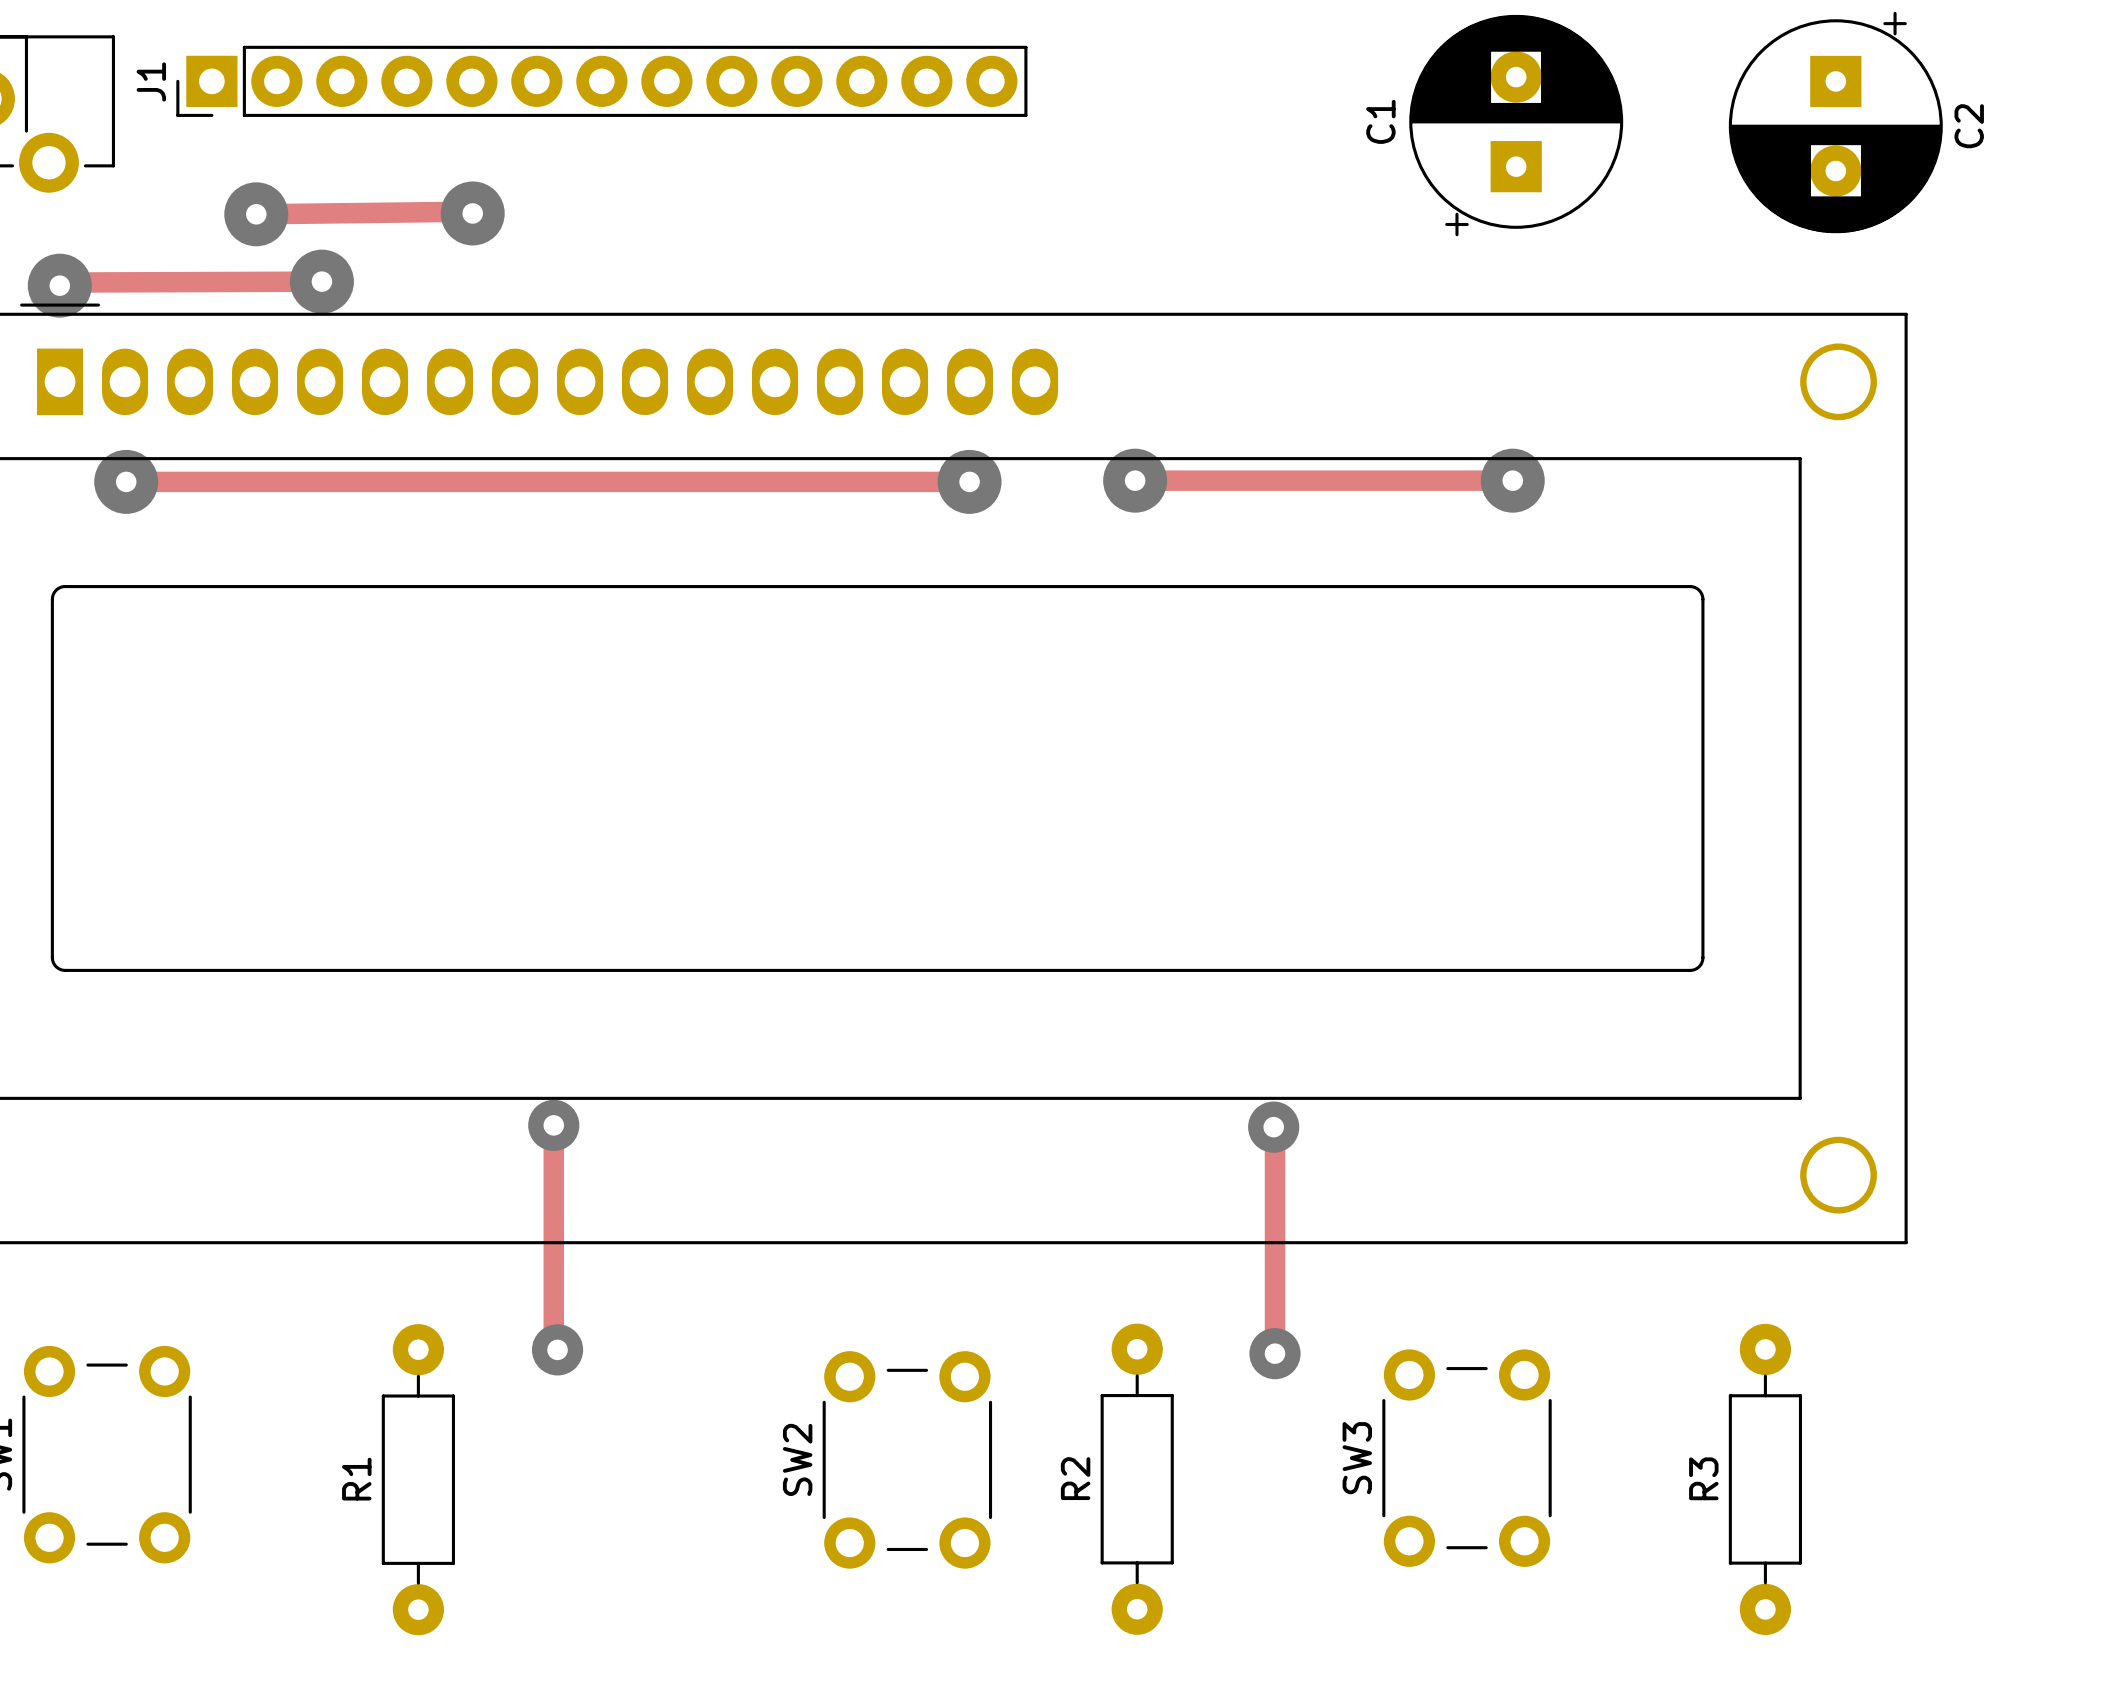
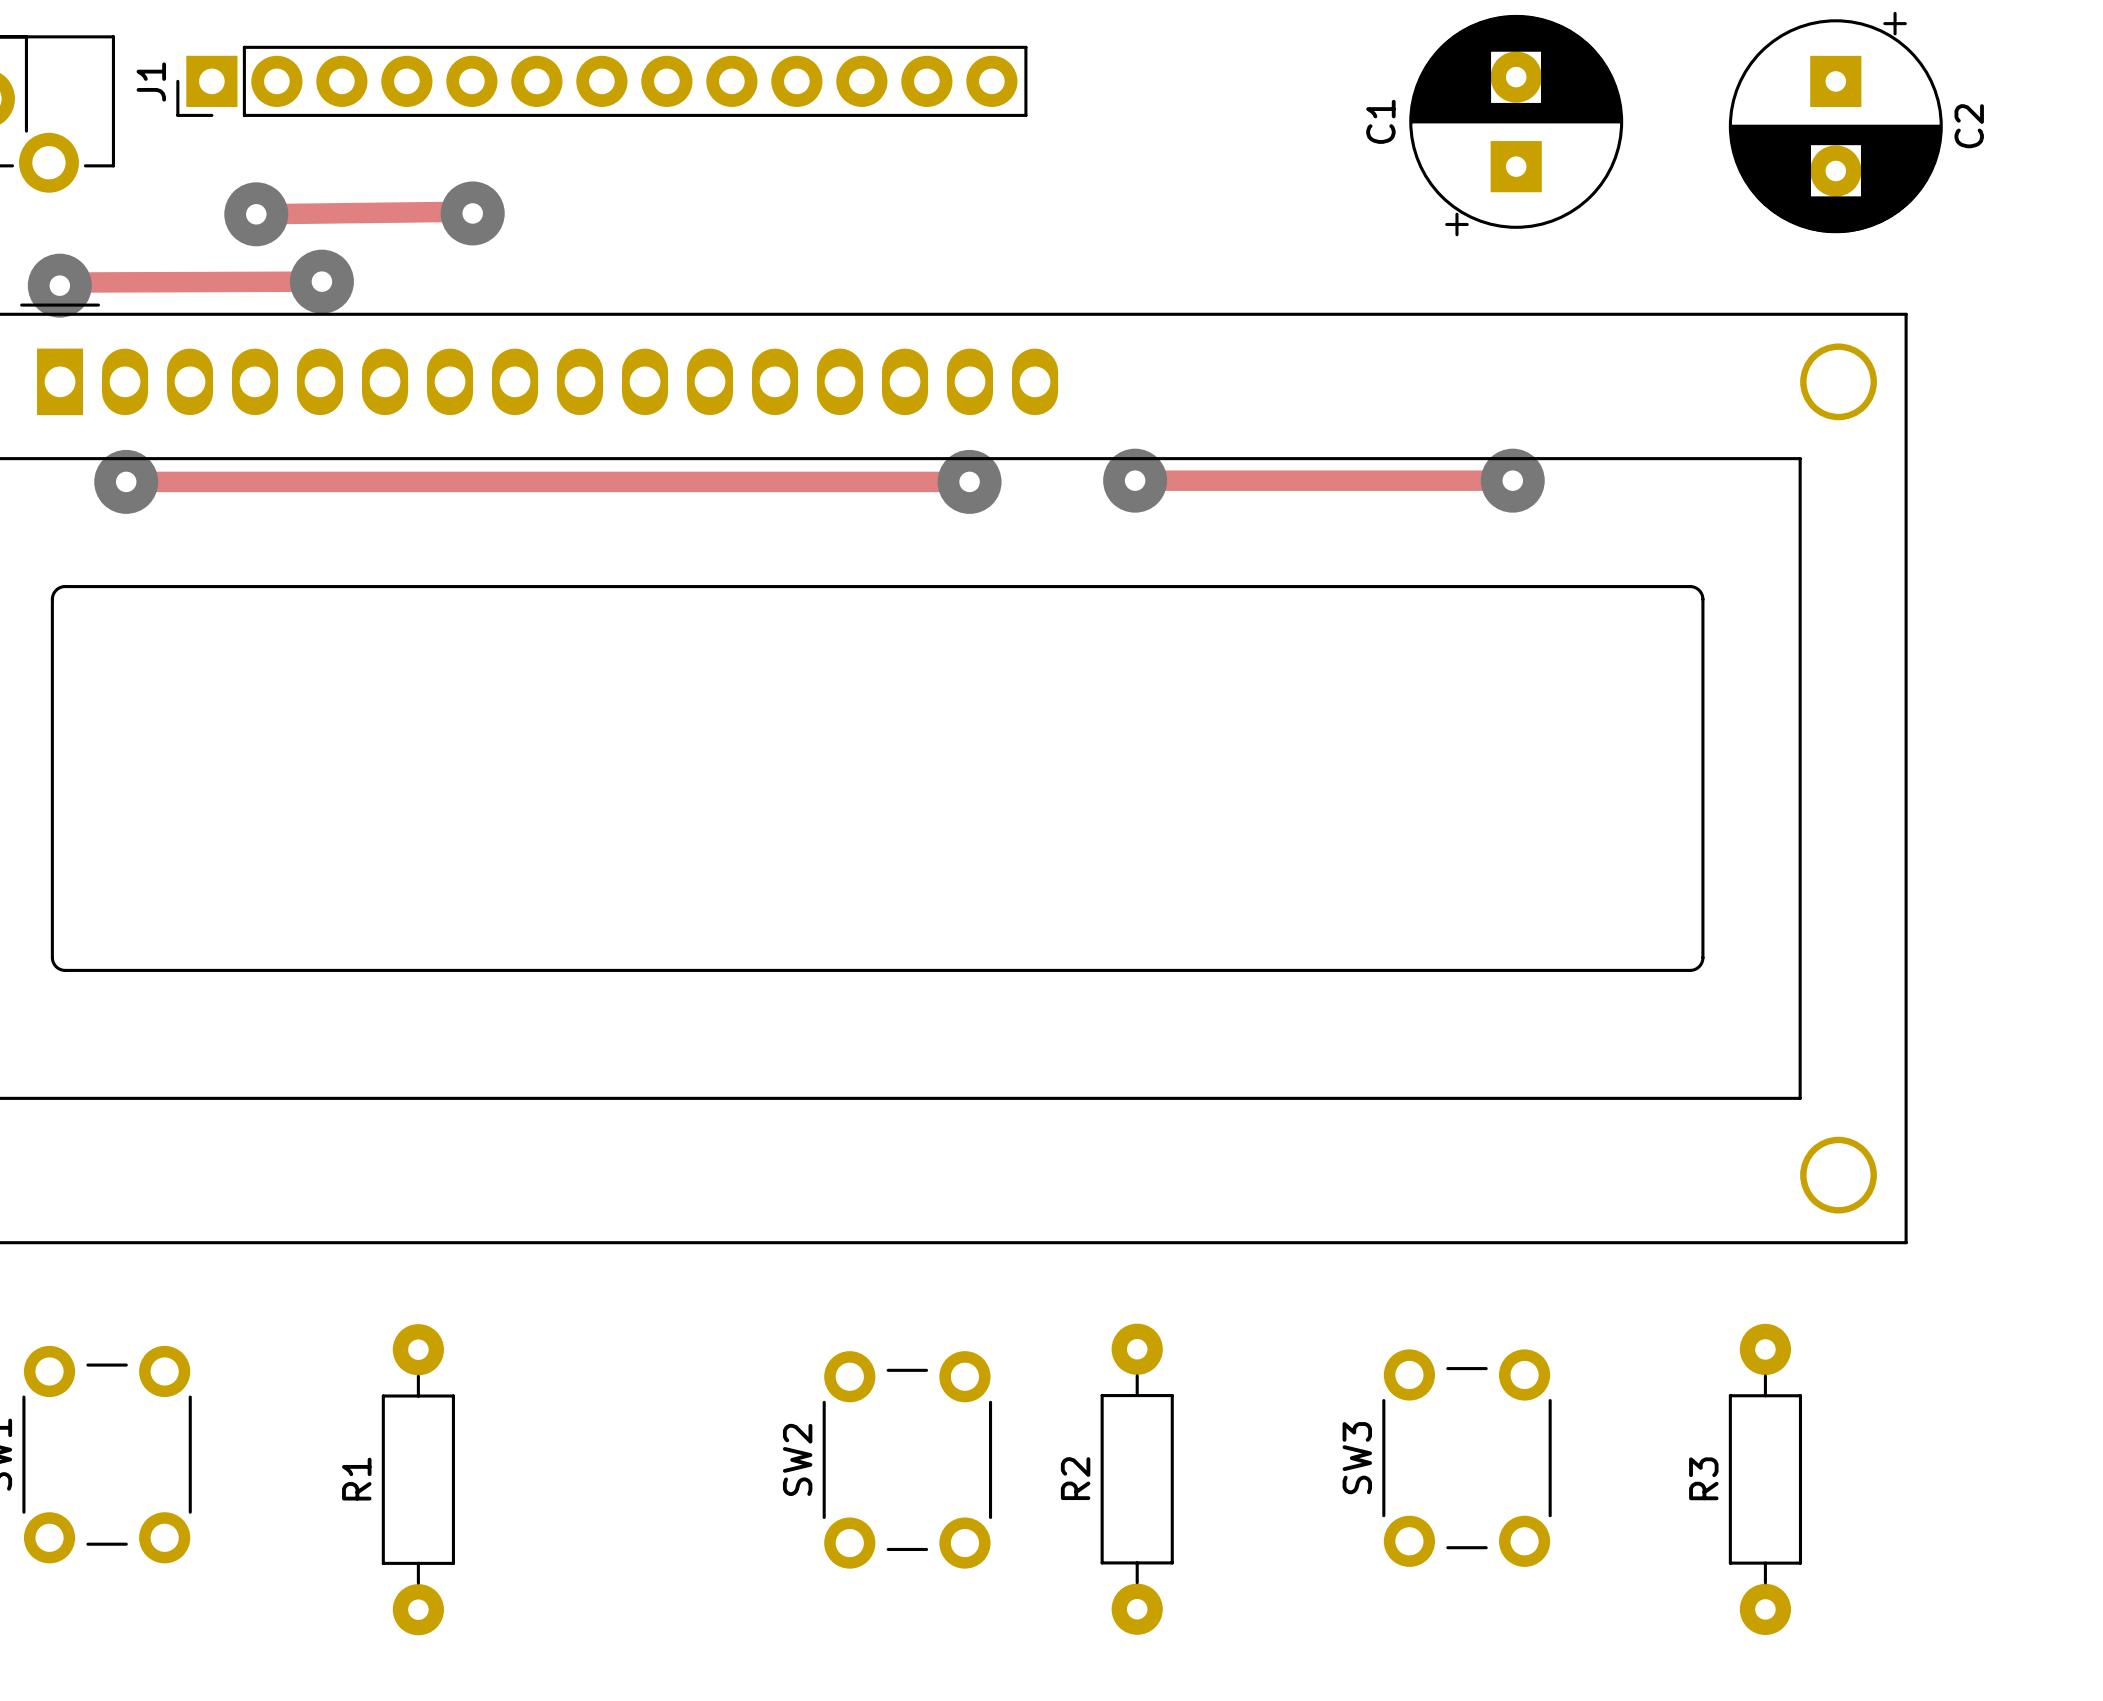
track: (553, 1125) (553, 1346) (557, 1349) -> none
via: (553, 1125) -> none
track: (1273, 1127) (1275, 1353) -> none
via: (1273, 1127) -> none
via: (557, 1349) -> none
via: (1275, 1353) -> none

